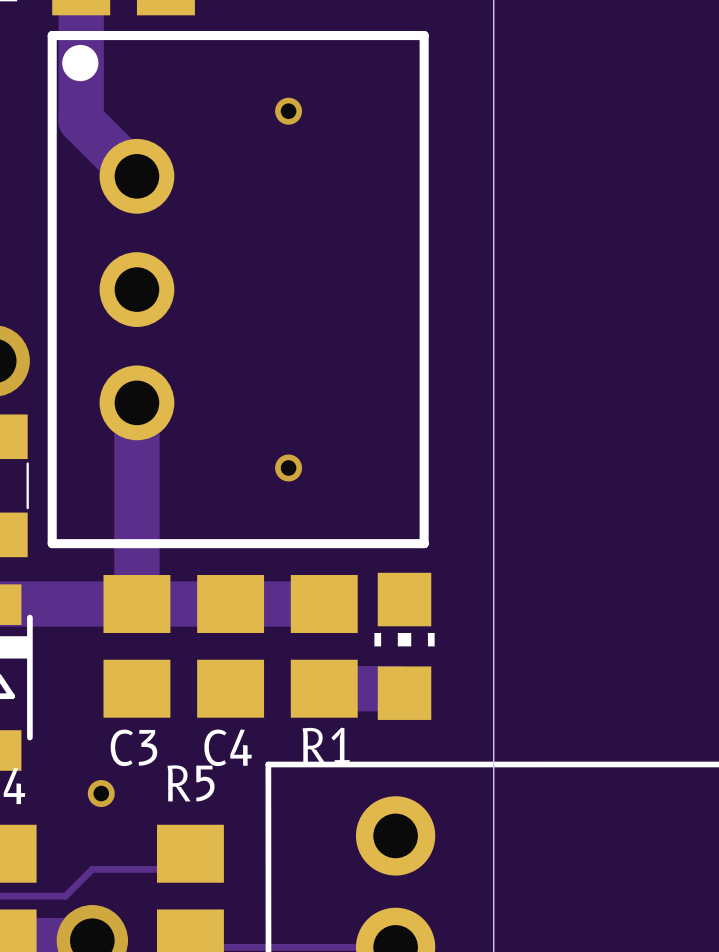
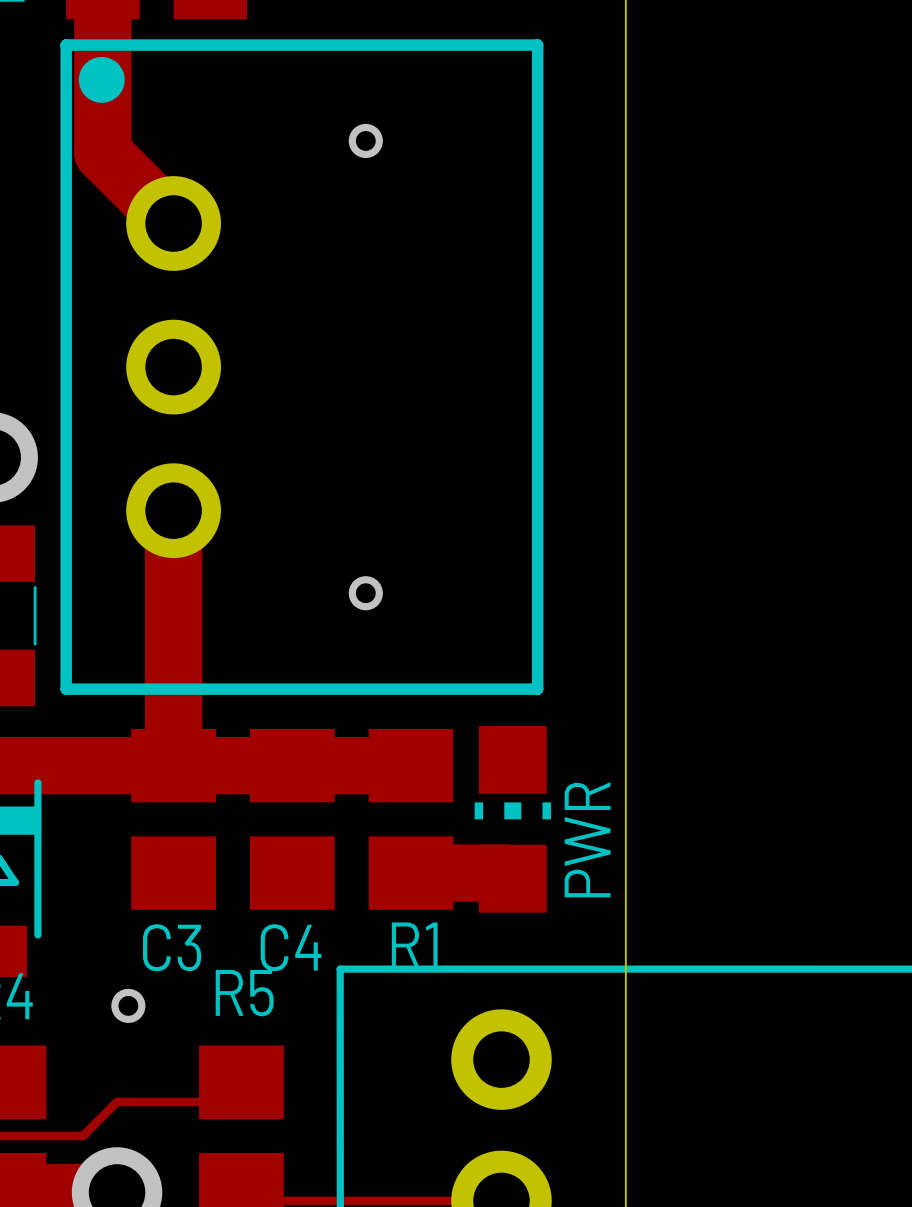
PWR name: none -> PWR (587, 839)

